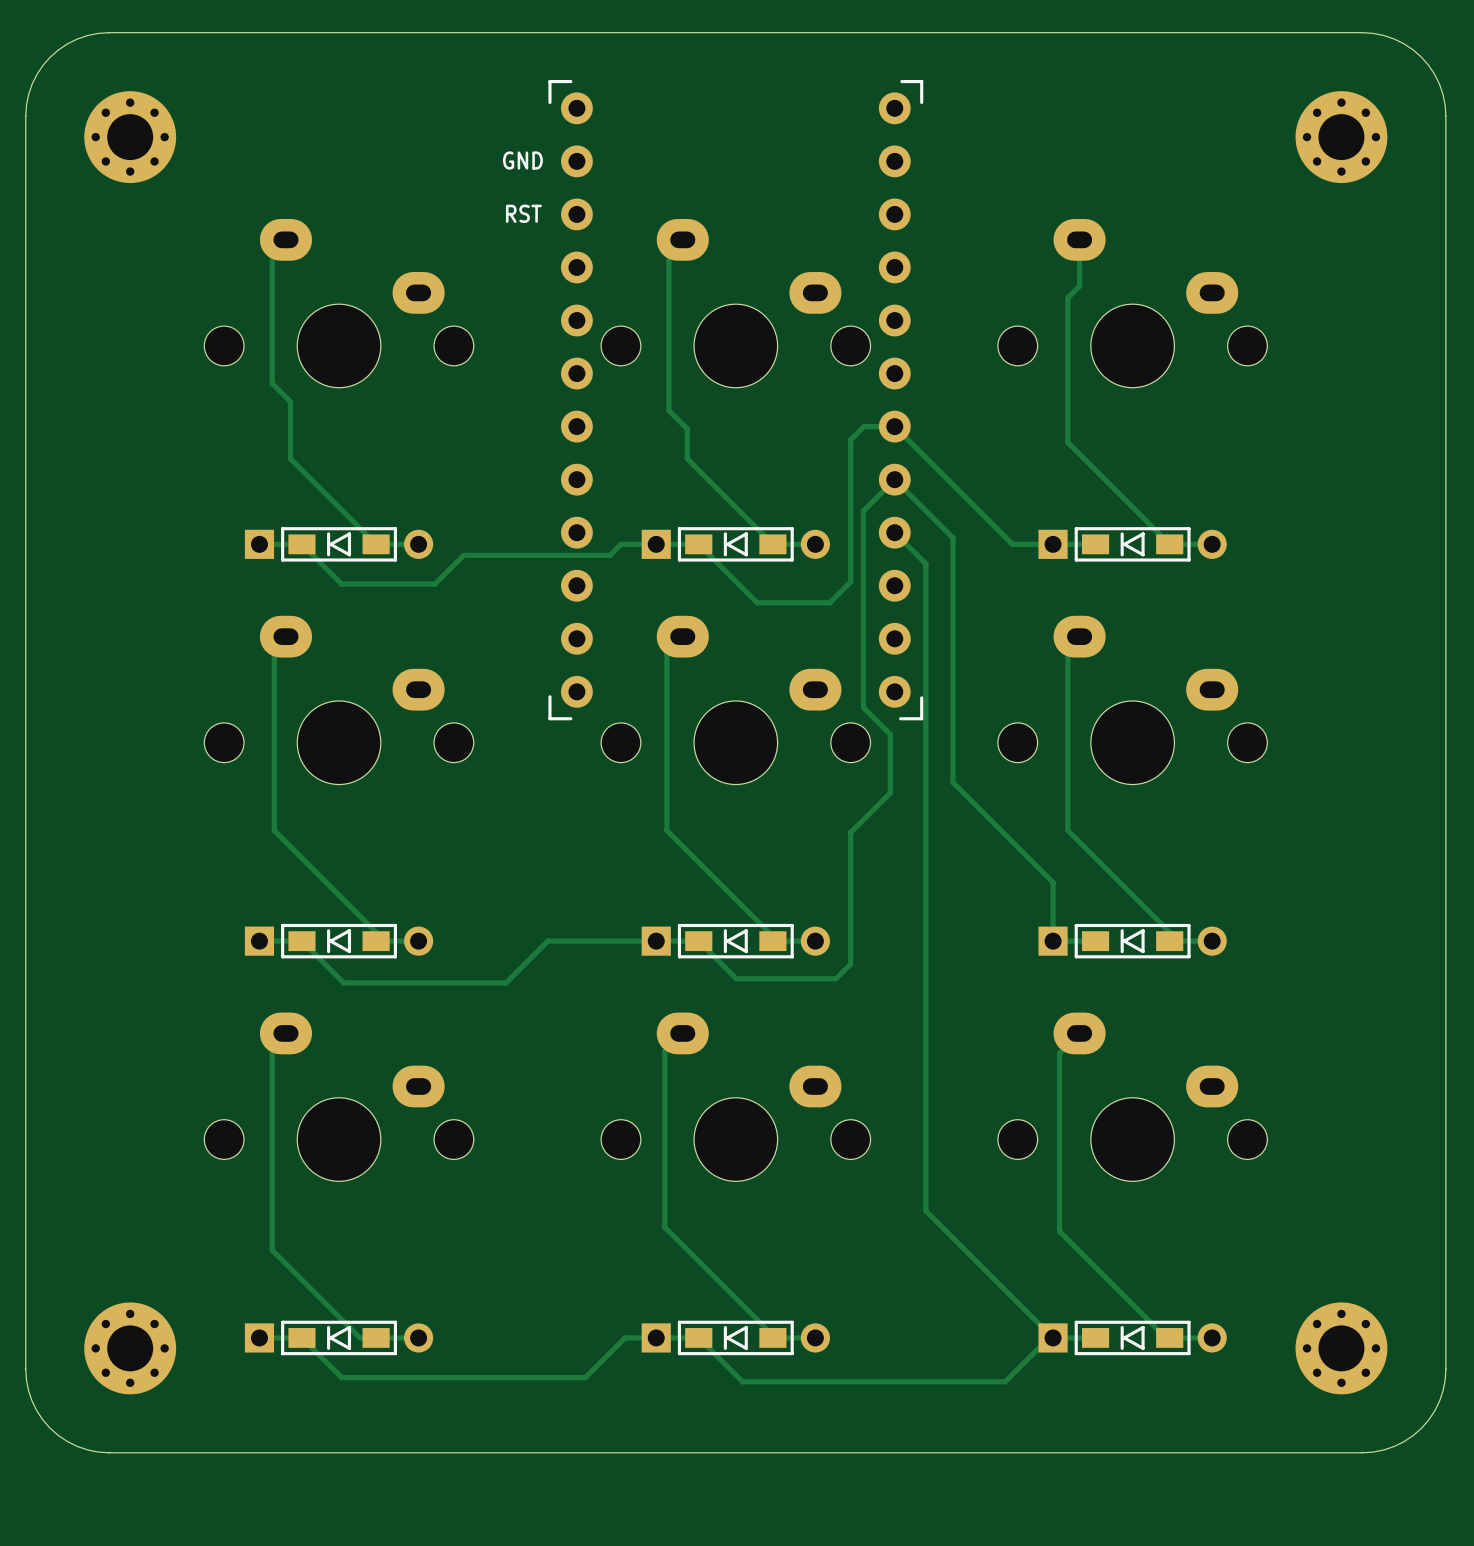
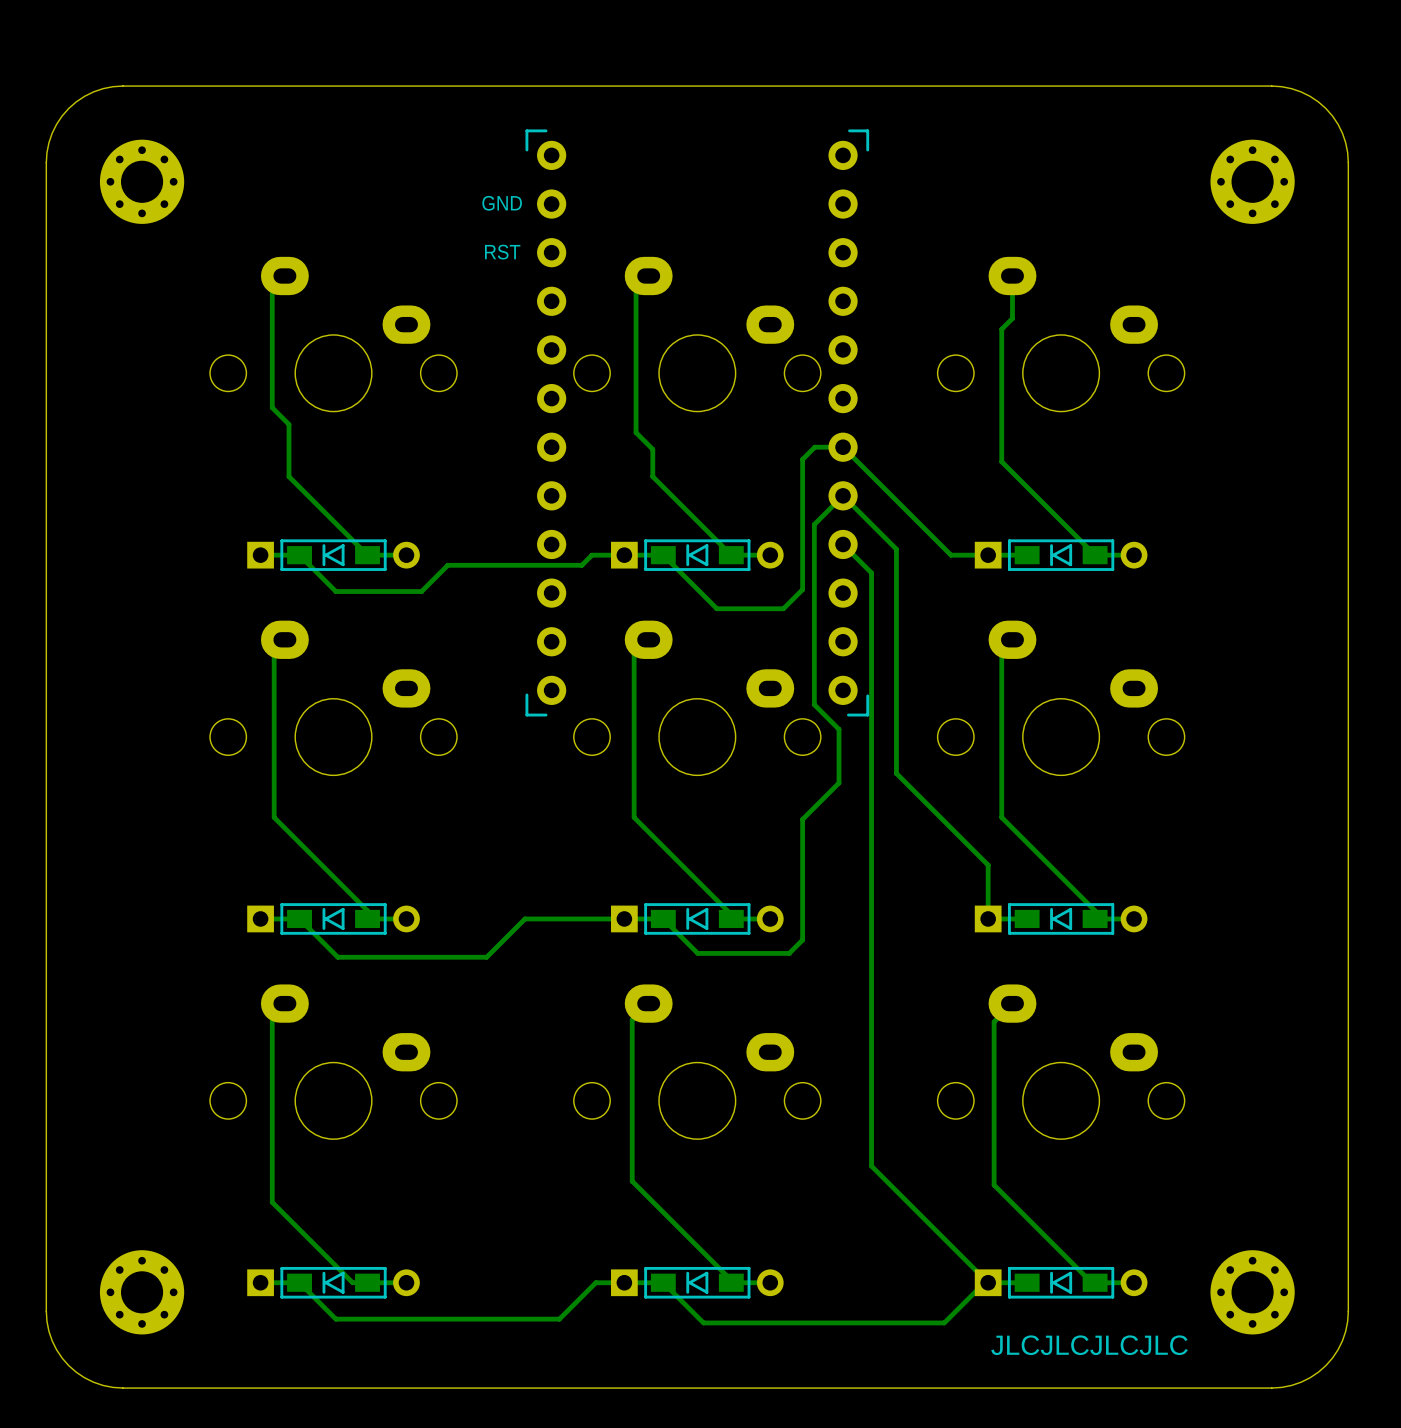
text: none -> JLCJLCJLCJLC (1089, 1345)

